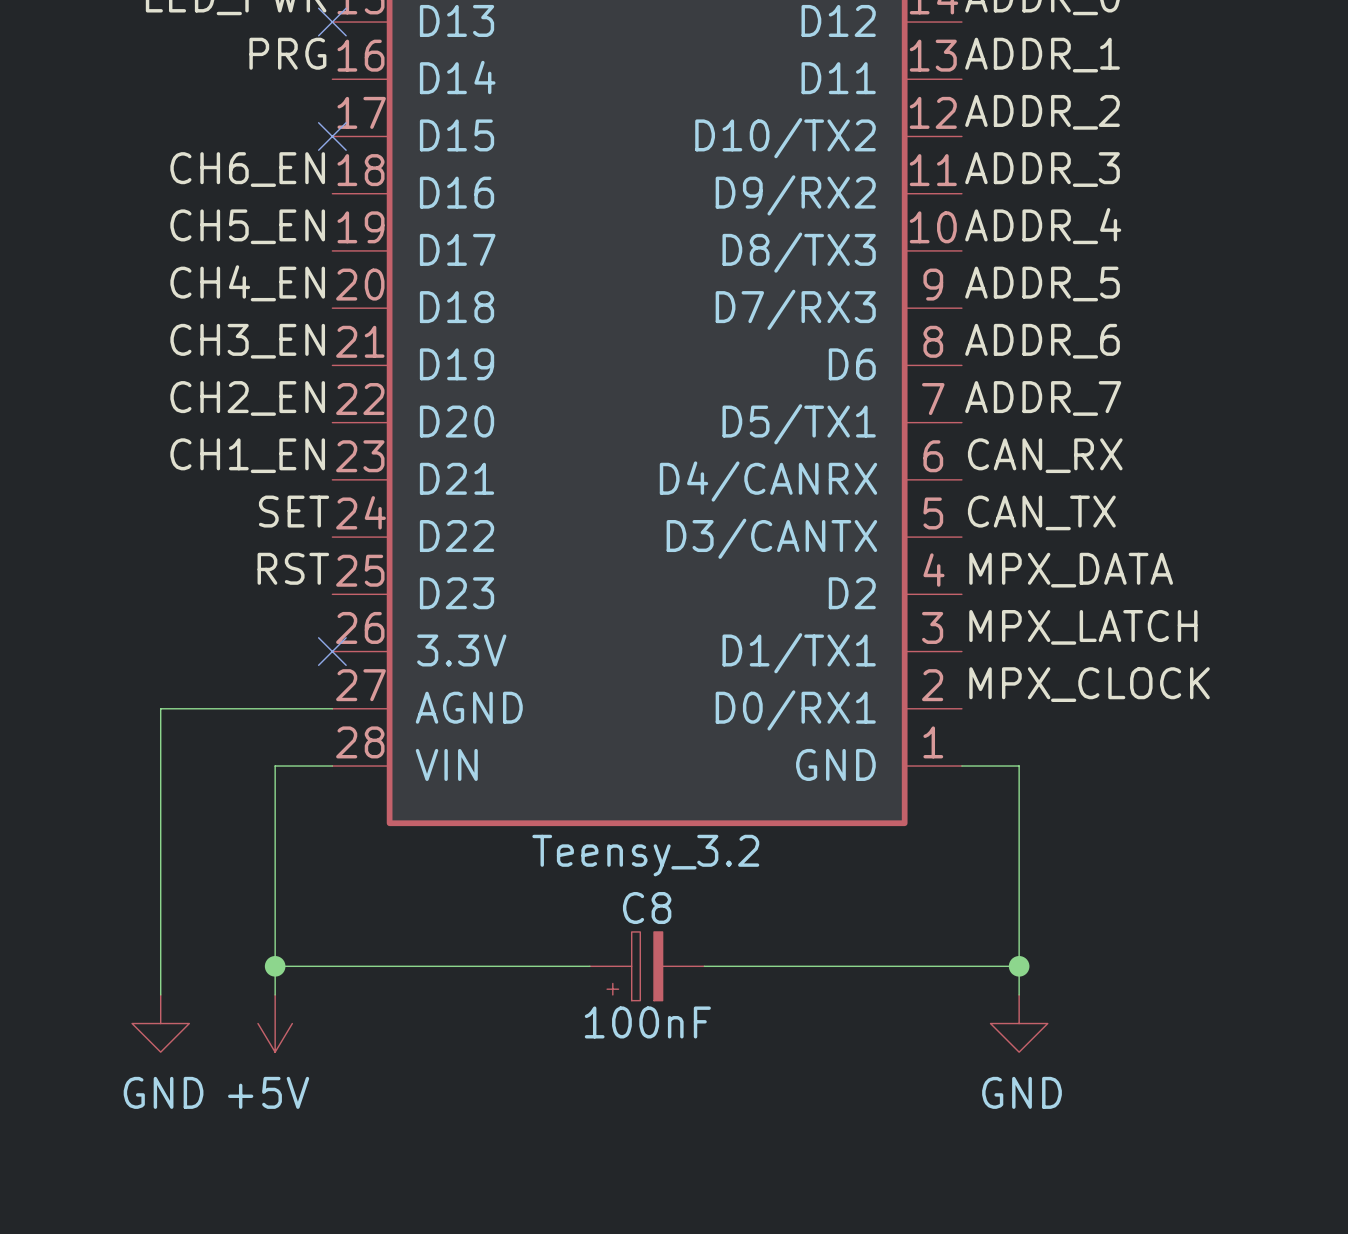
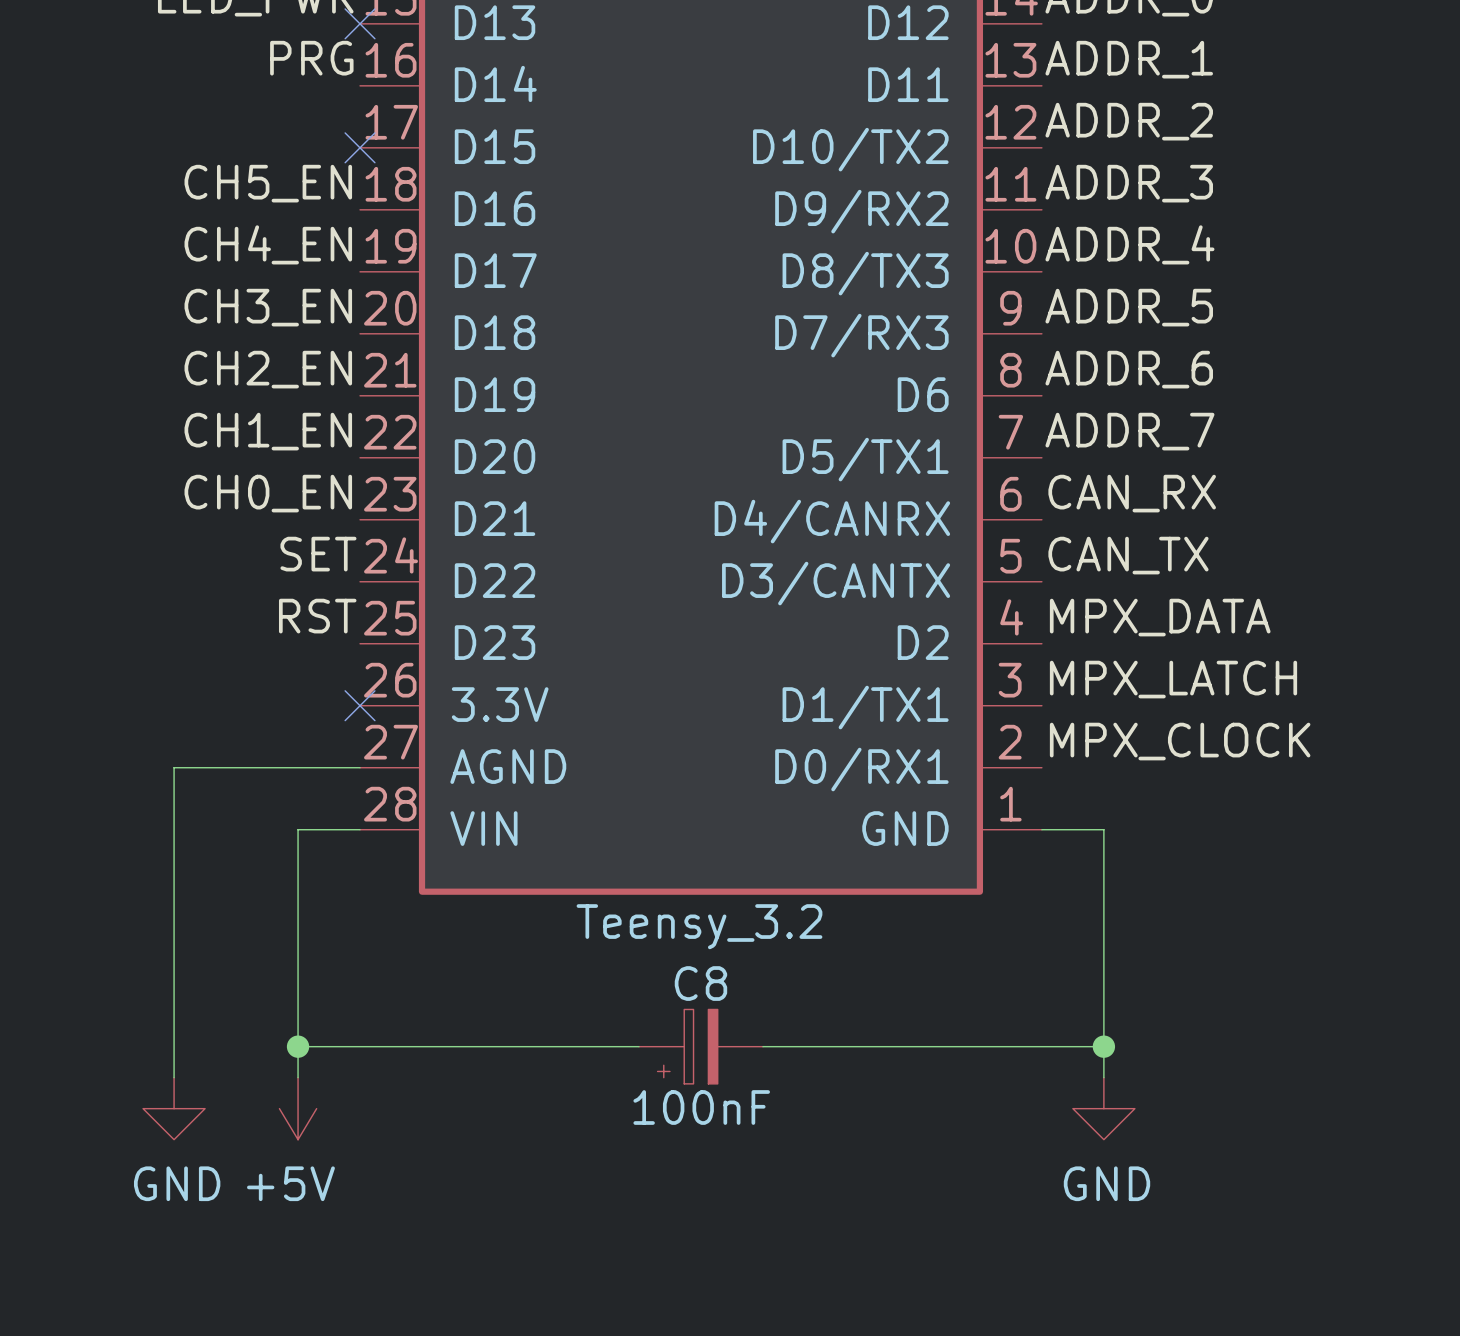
label: CH6_EN (247, 169) -> CH5_EN (268, 183)
label: CH5_EN (247, 226) -> CH4_EN (268, 244)
label: CH4_EN (247, 283) -> CH3_EN (268, 307)
label: CH3_EN (247, 341) -> CH2_EN (268, 369)
label: CH2_EN (247, 398) -> CH1_EN (268, 431)
label: CH1_EN (247, 455) -> CH0_EN (268, 493)

